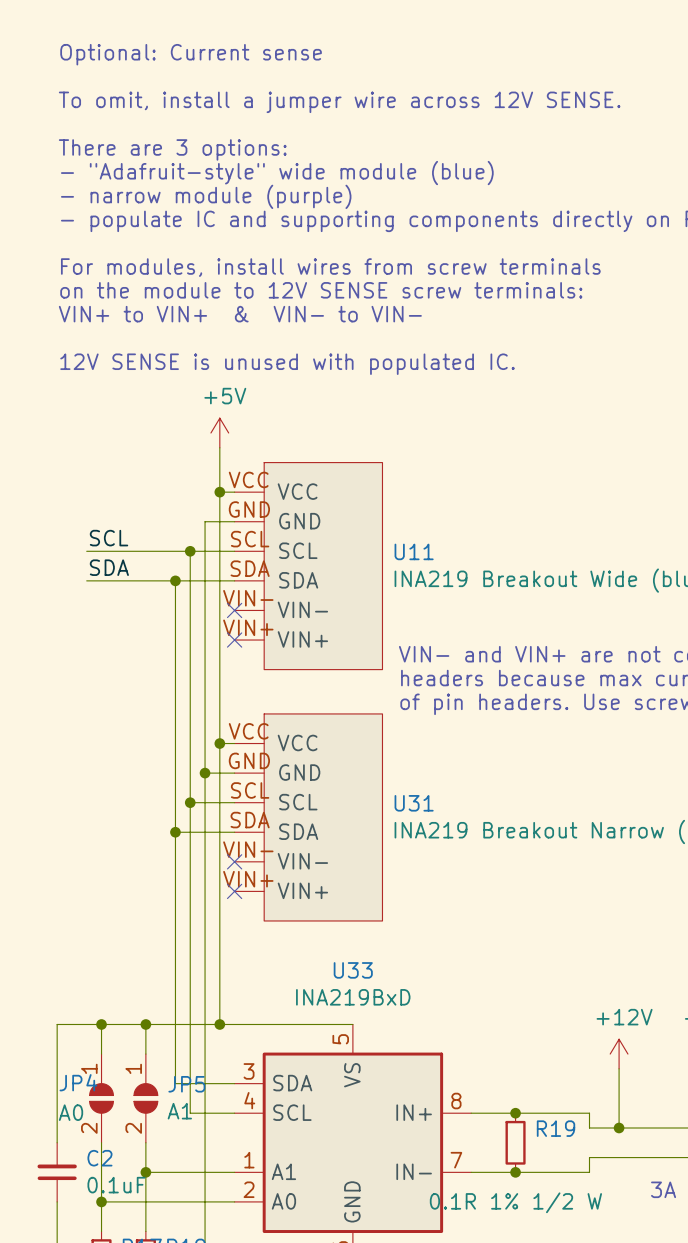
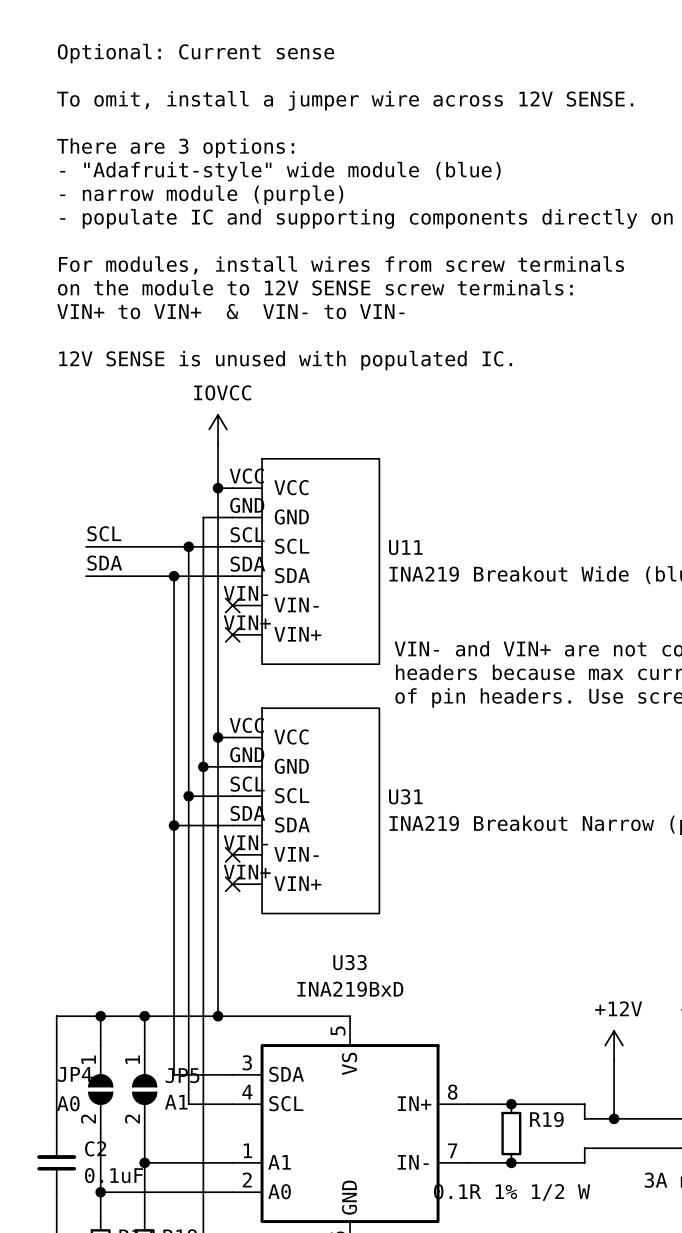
power symbol: +5V (219, 433) -> IOVCC (218, 429)

